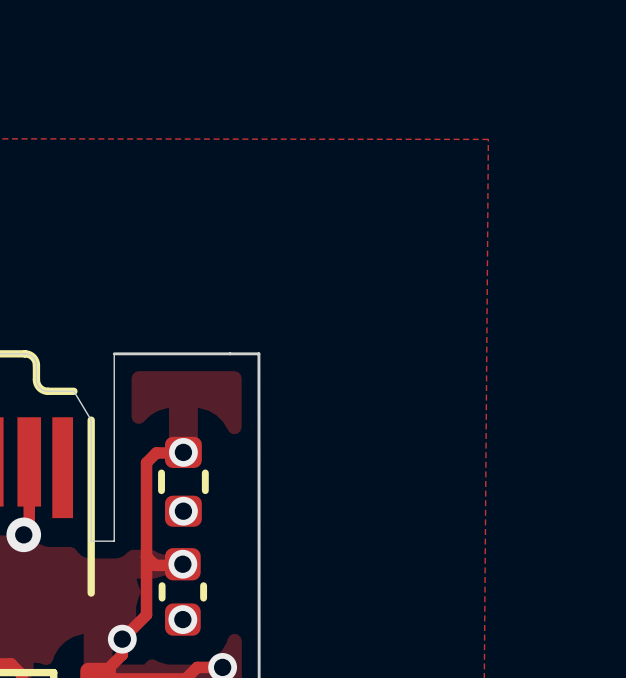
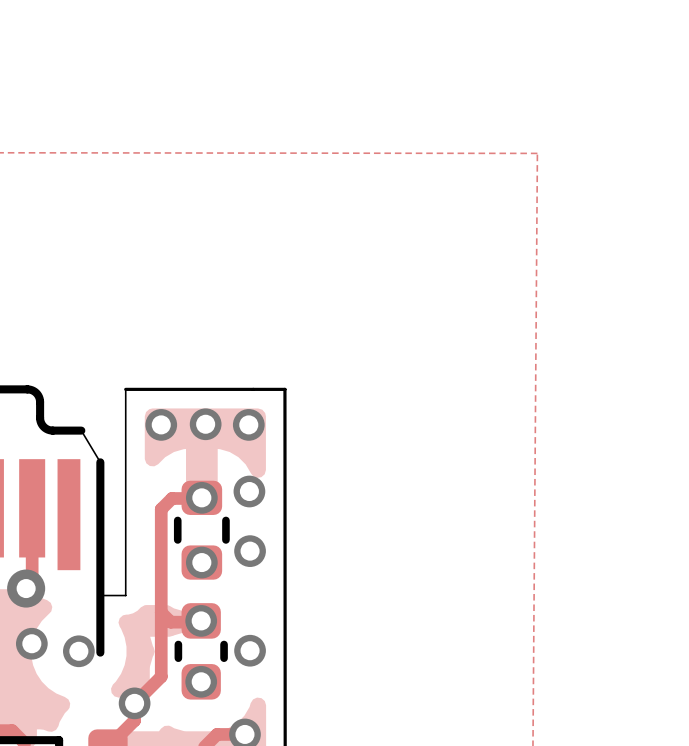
via: none -> (205, 424)
via: none -> (161, 424)
via: none -> (248, 424)
via: none -> (249, 491)
via: none -> (250, 551)
via: none -> (31, 643)
via: none -> (78, 651)
via: none -> (250, 650)

